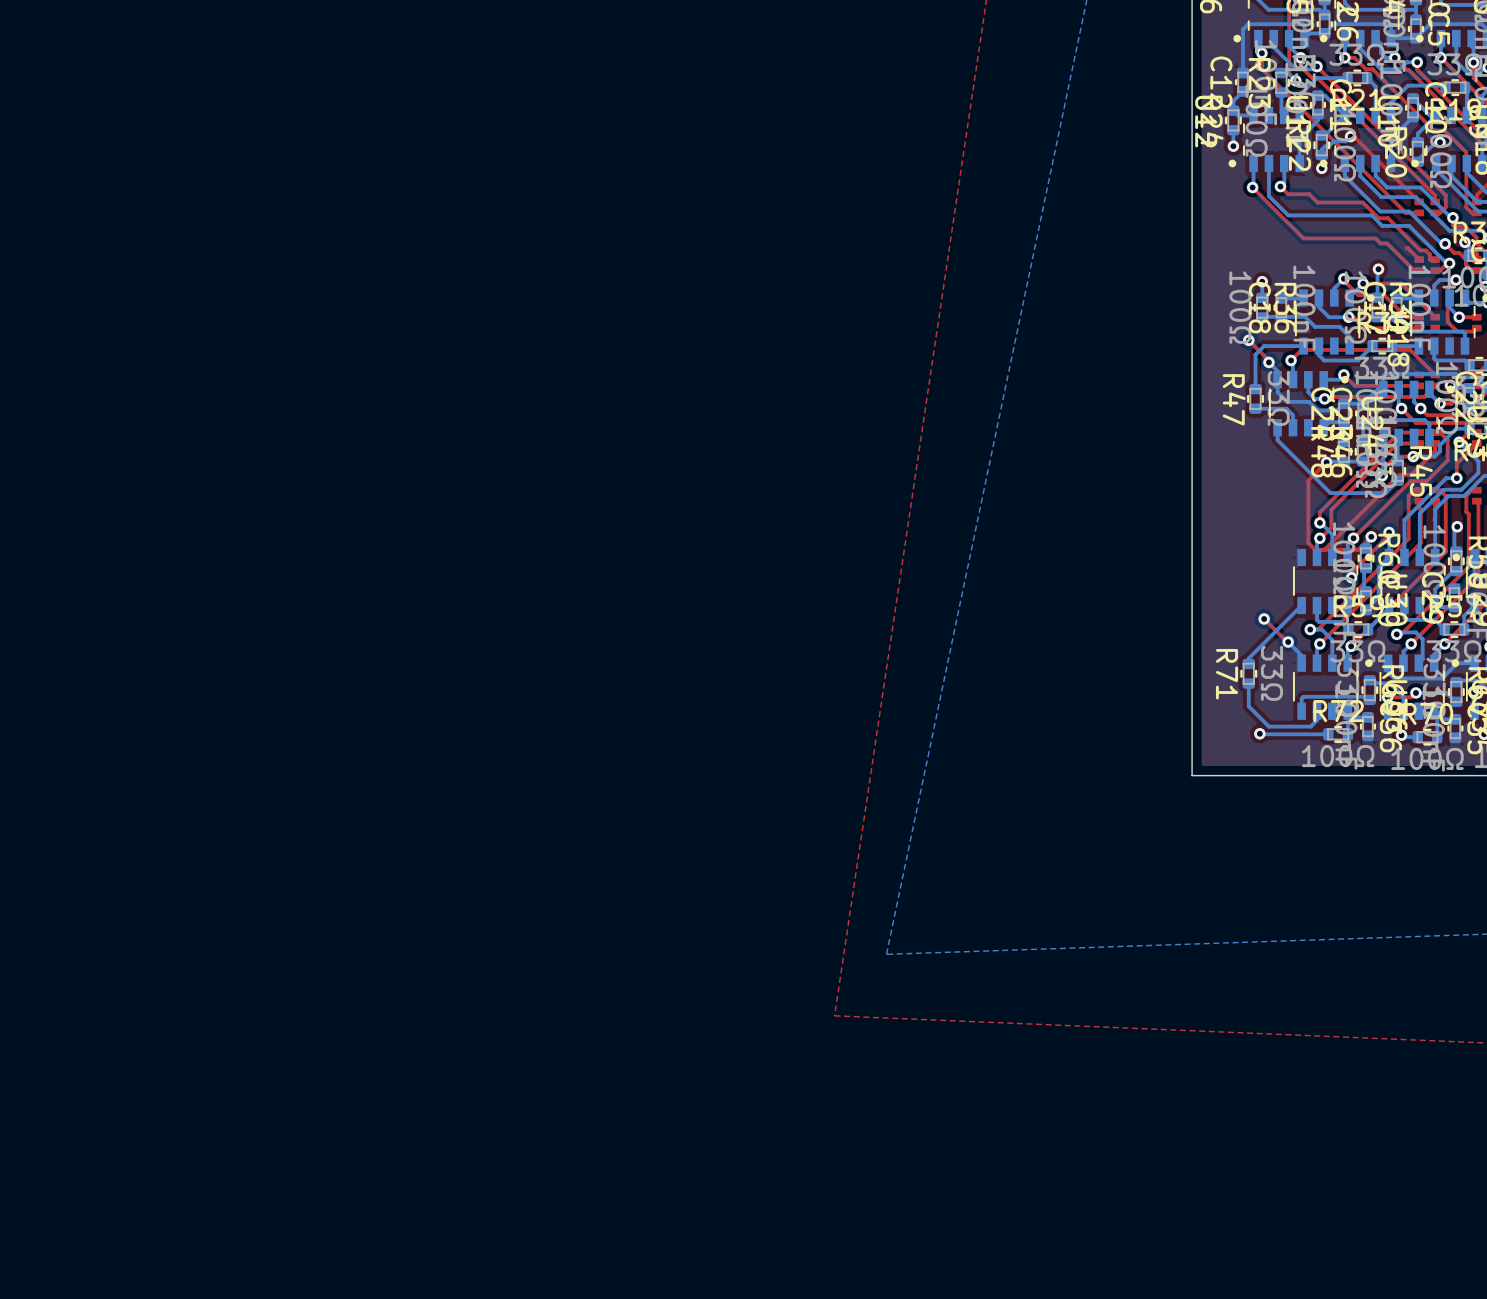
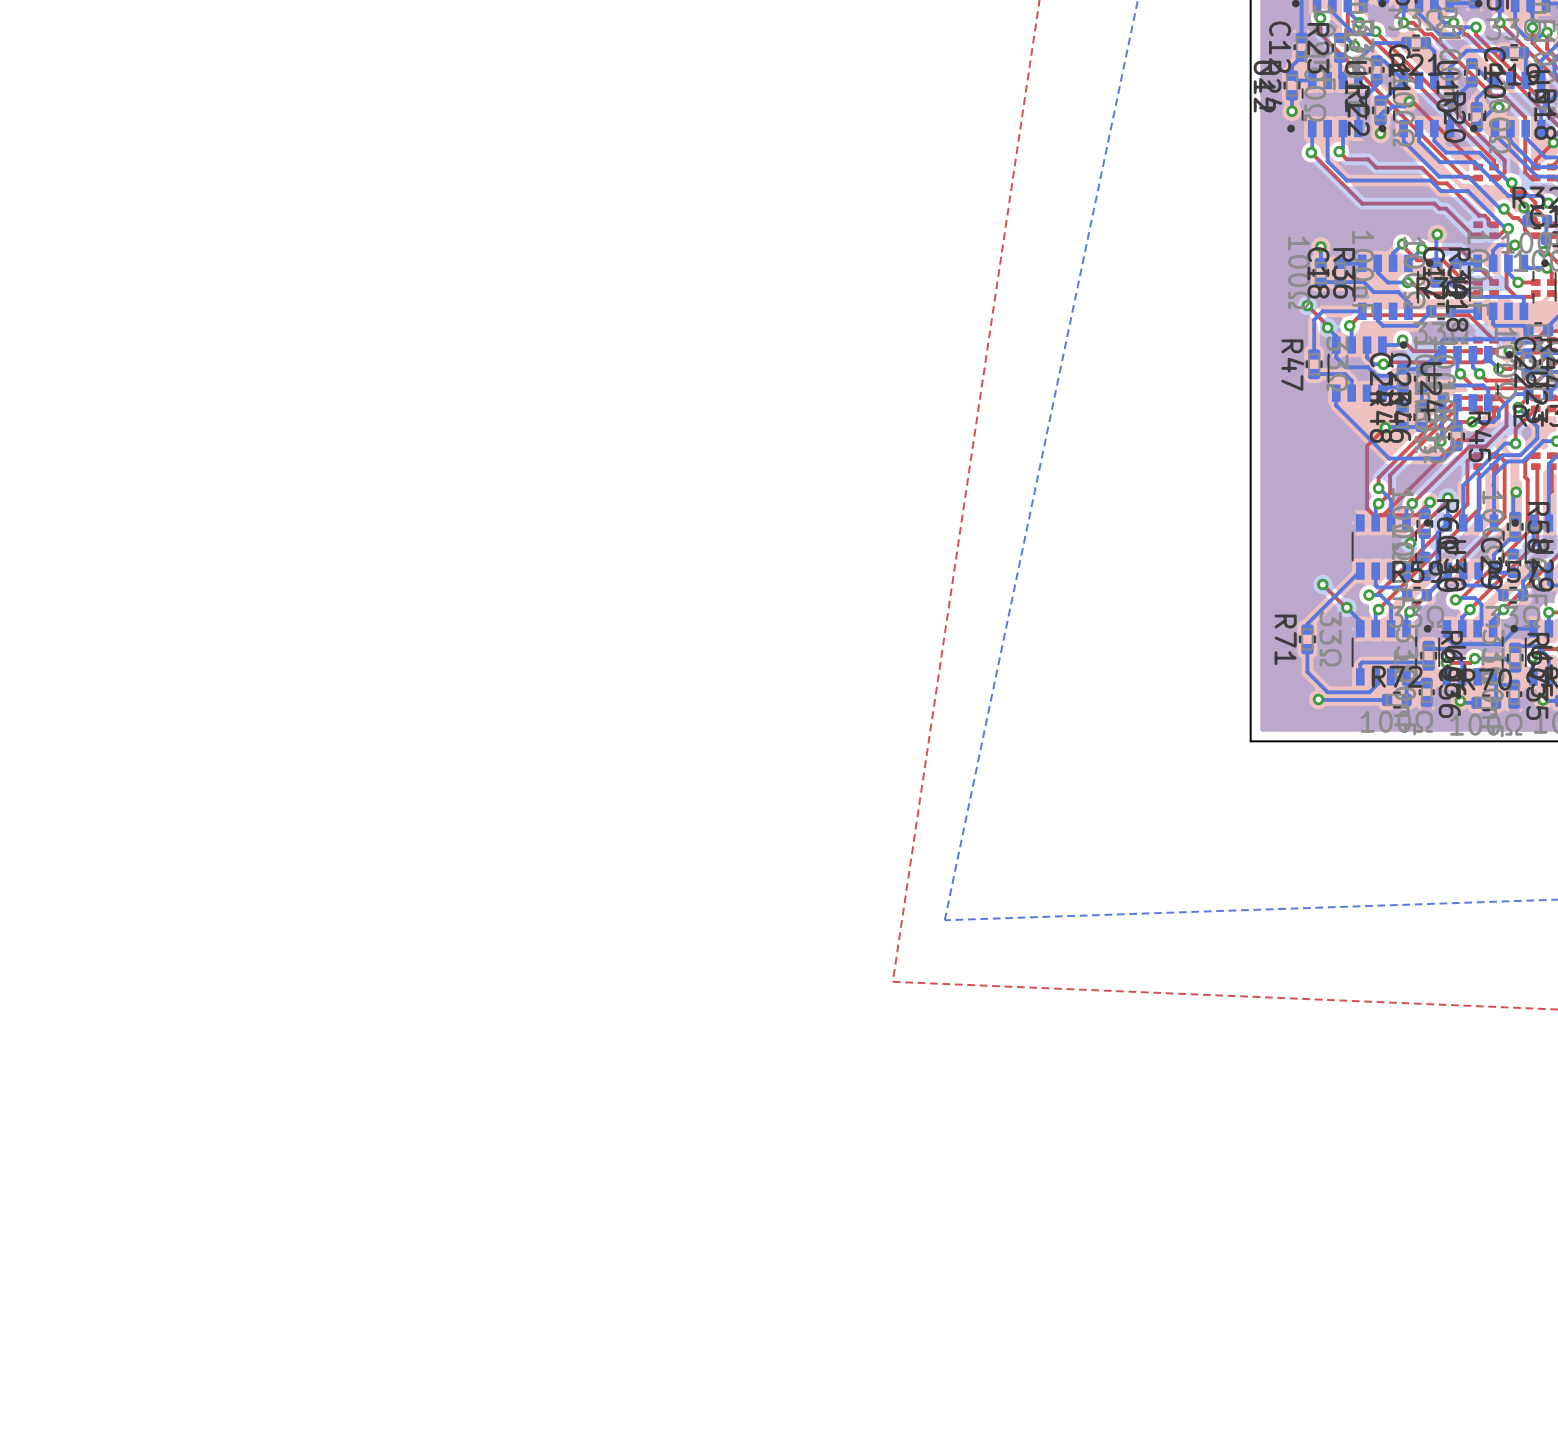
top track: (1406, 248) (1419, 259) -> none

